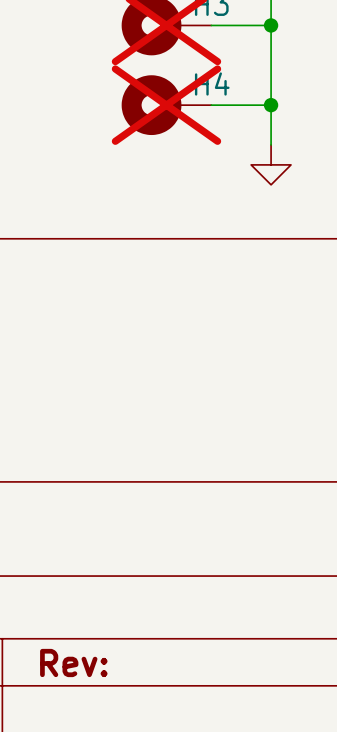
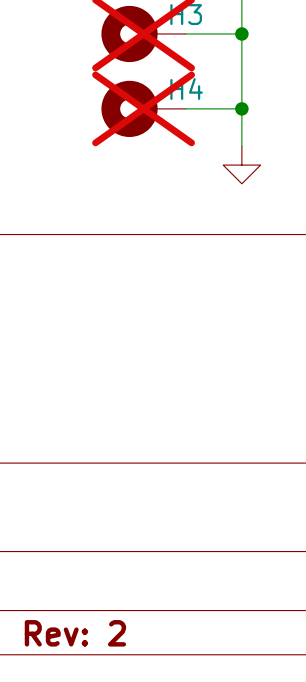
title block: Rev: (73, 663) -> Rev: 2 (75, 633)

